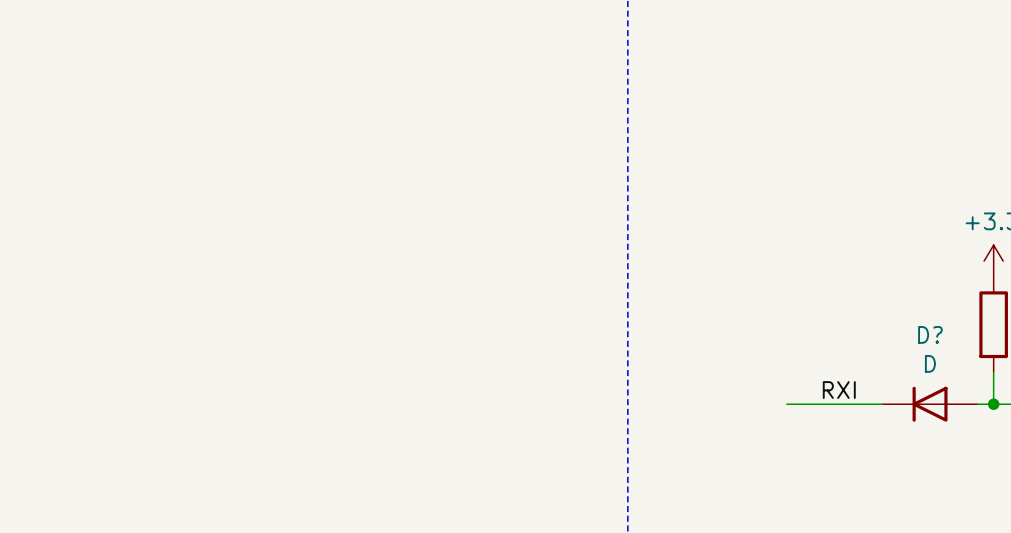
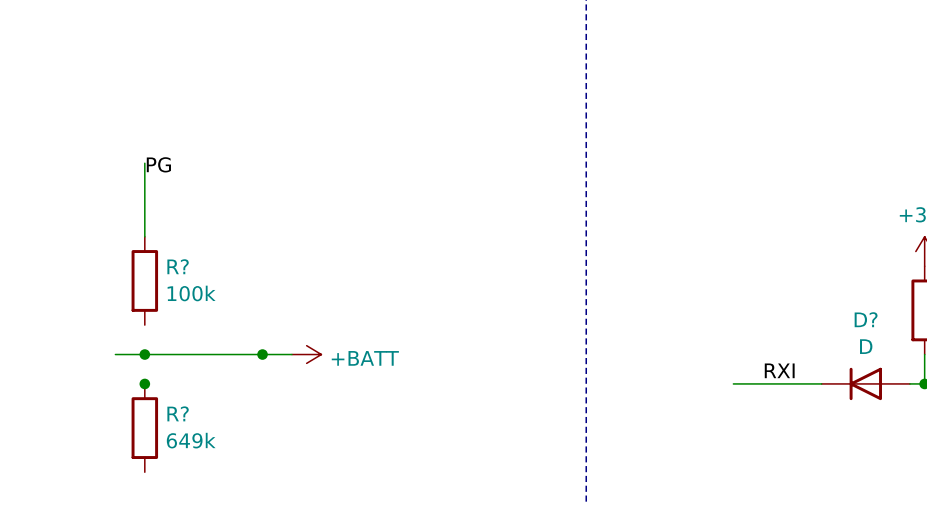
wire: none -> (144, 163) (144, 236)
label: none -> PG (158, 164)
R?: none -> 100k (144, 280)
wire: none -> (115, 354) (291, 354)
junction: none -> (144, 354)
junction: none -> (262, 354)
power symbol: none -> +BATT (306, 354)
junction: none -> (144, 383)
R?: none -> 649k (144, 428)

